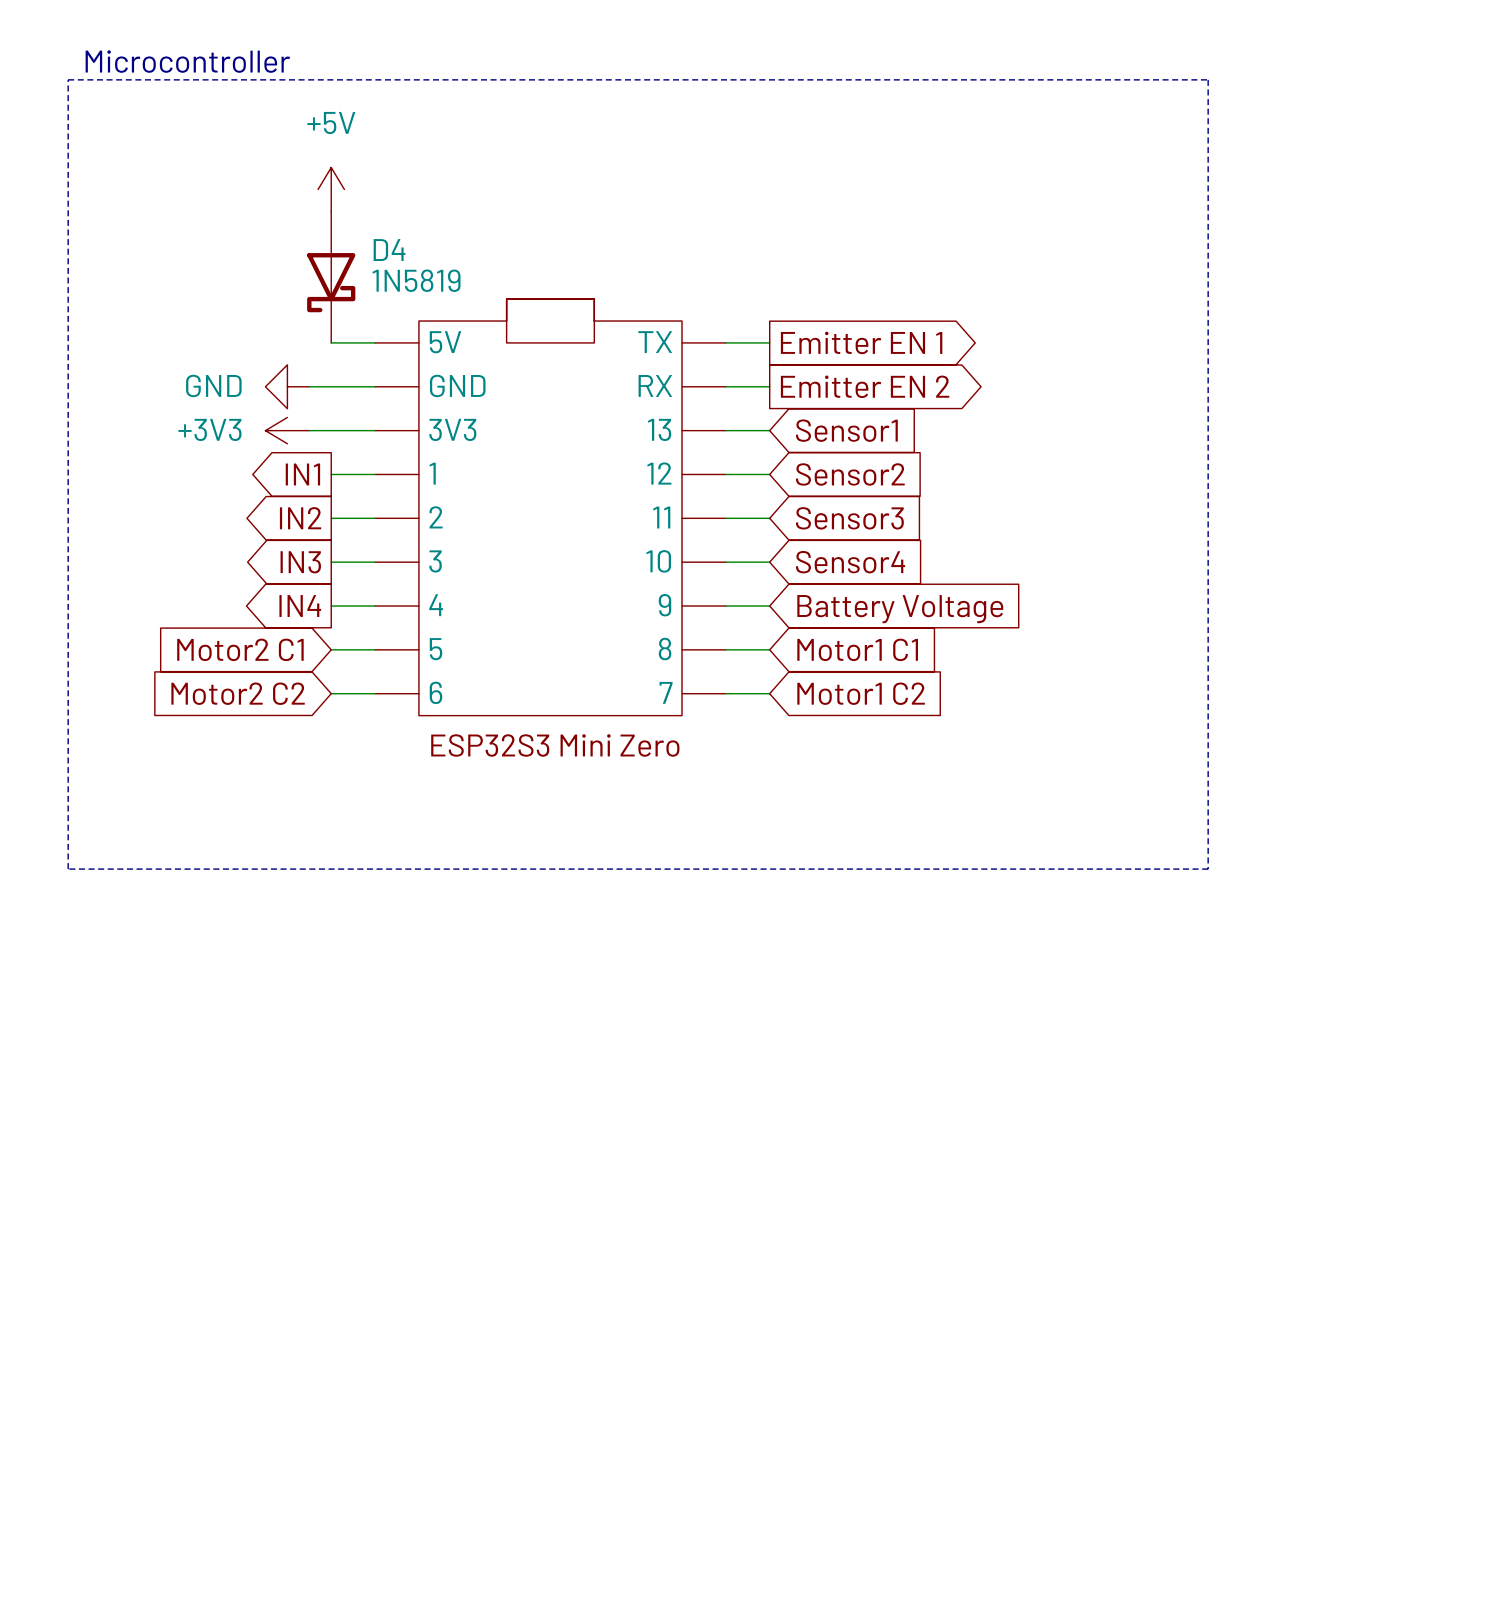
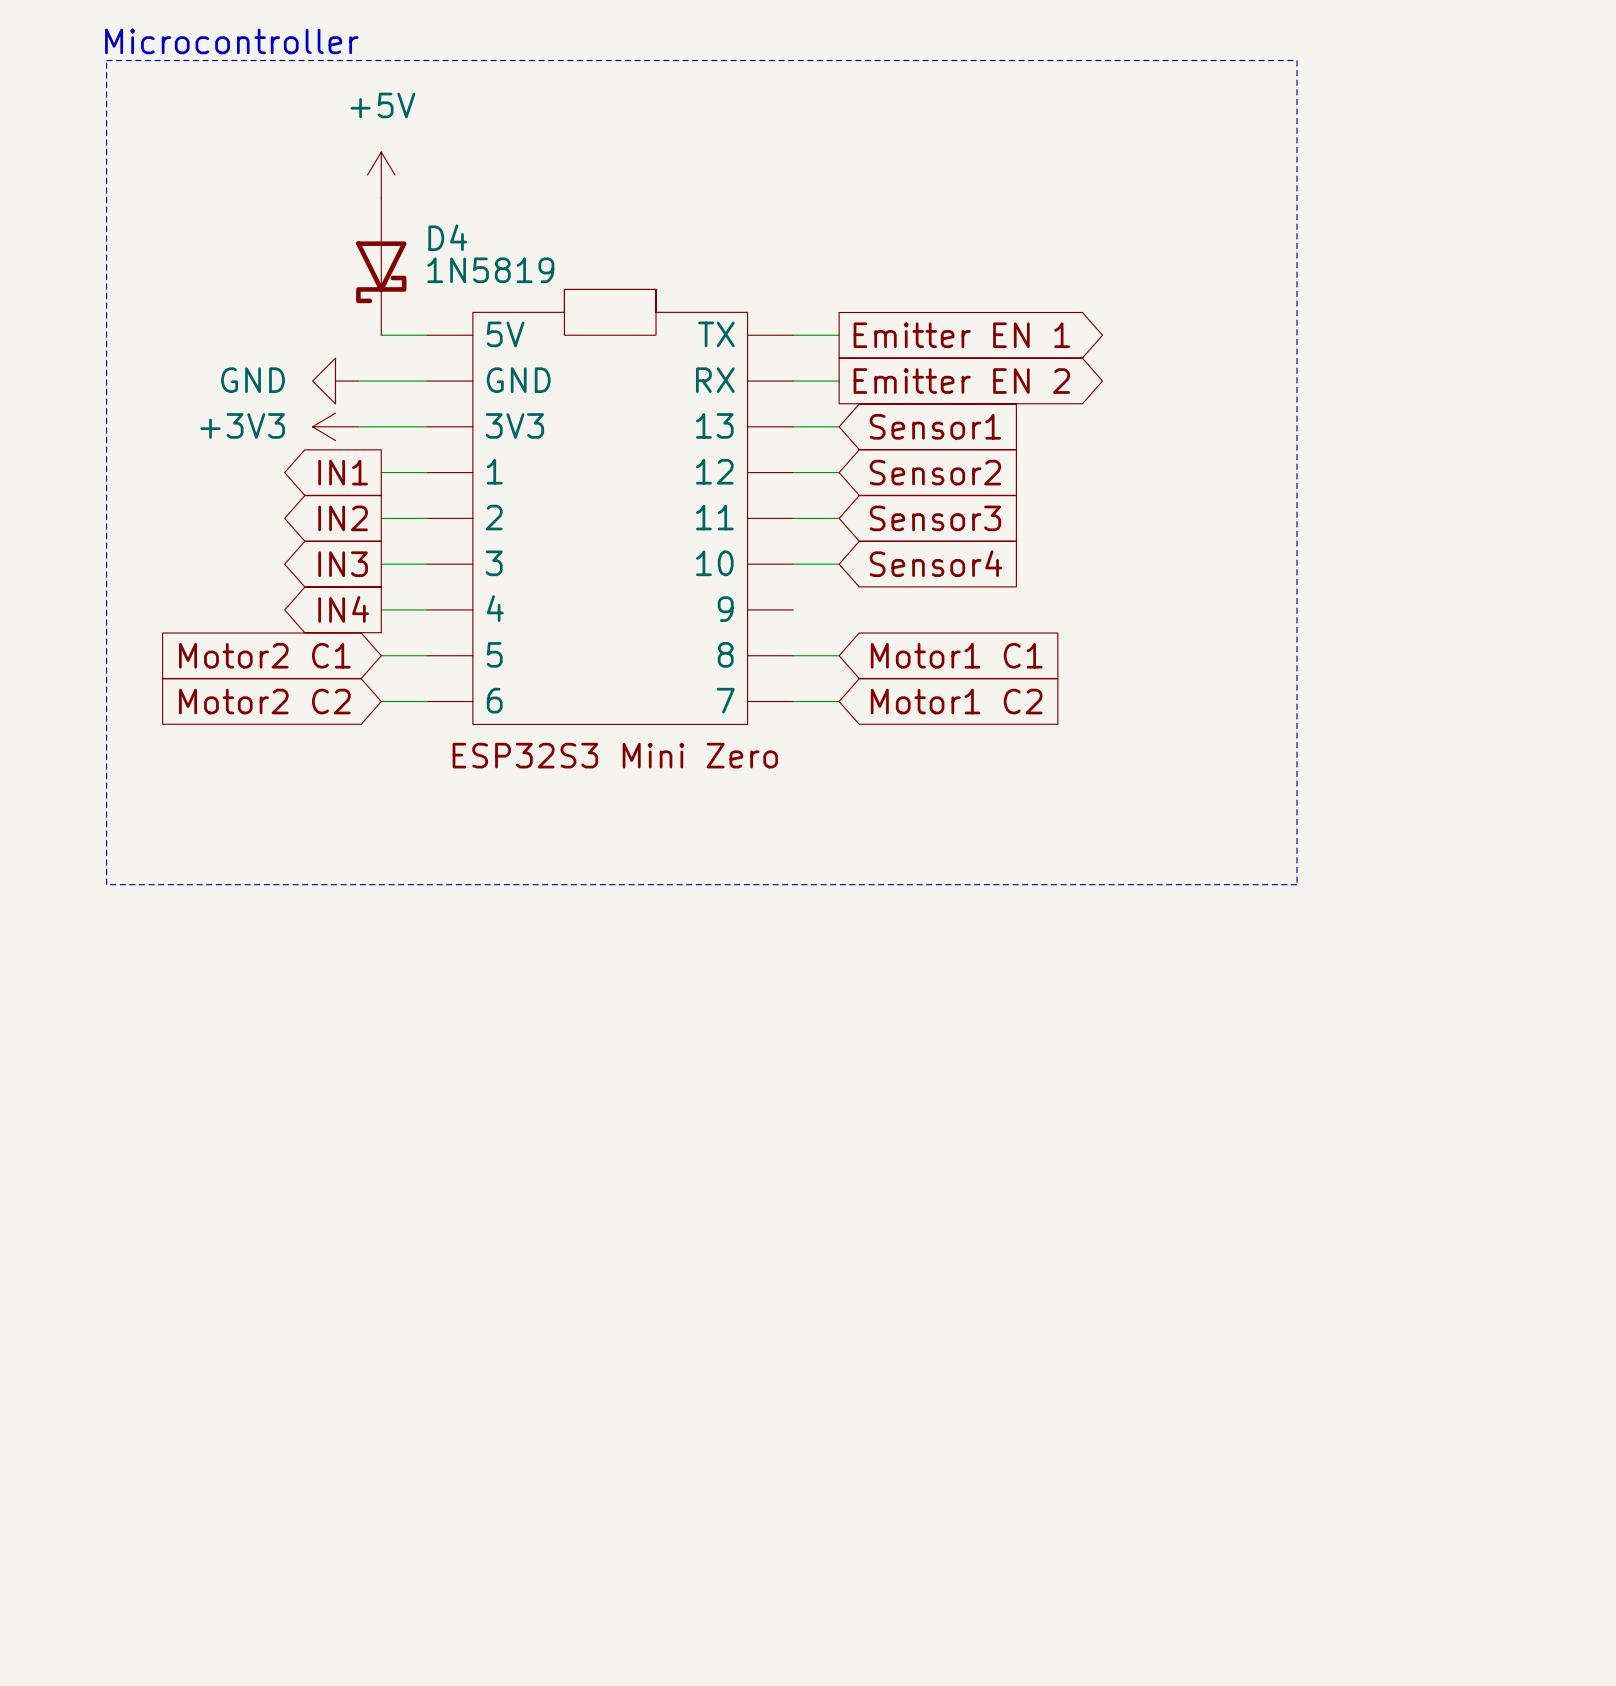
wire: (725, 606) (769, 606) -> none
global label: Battery Voltage (900, 609) -> none

